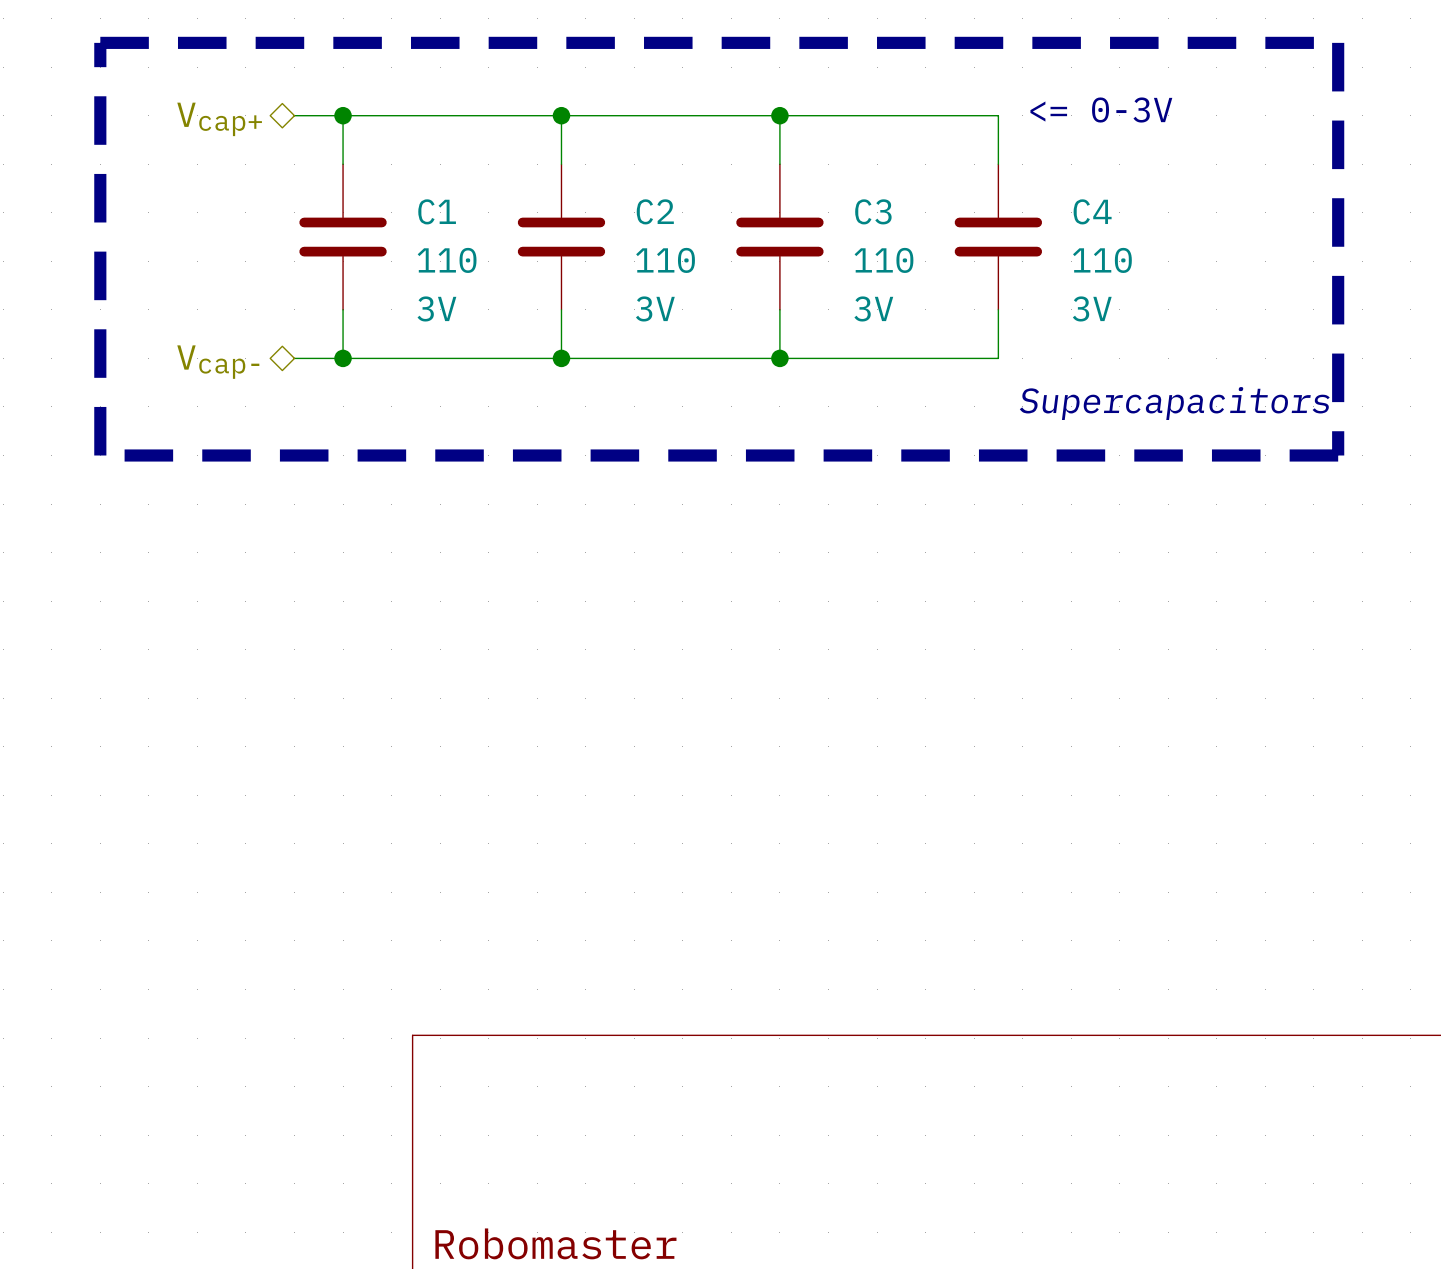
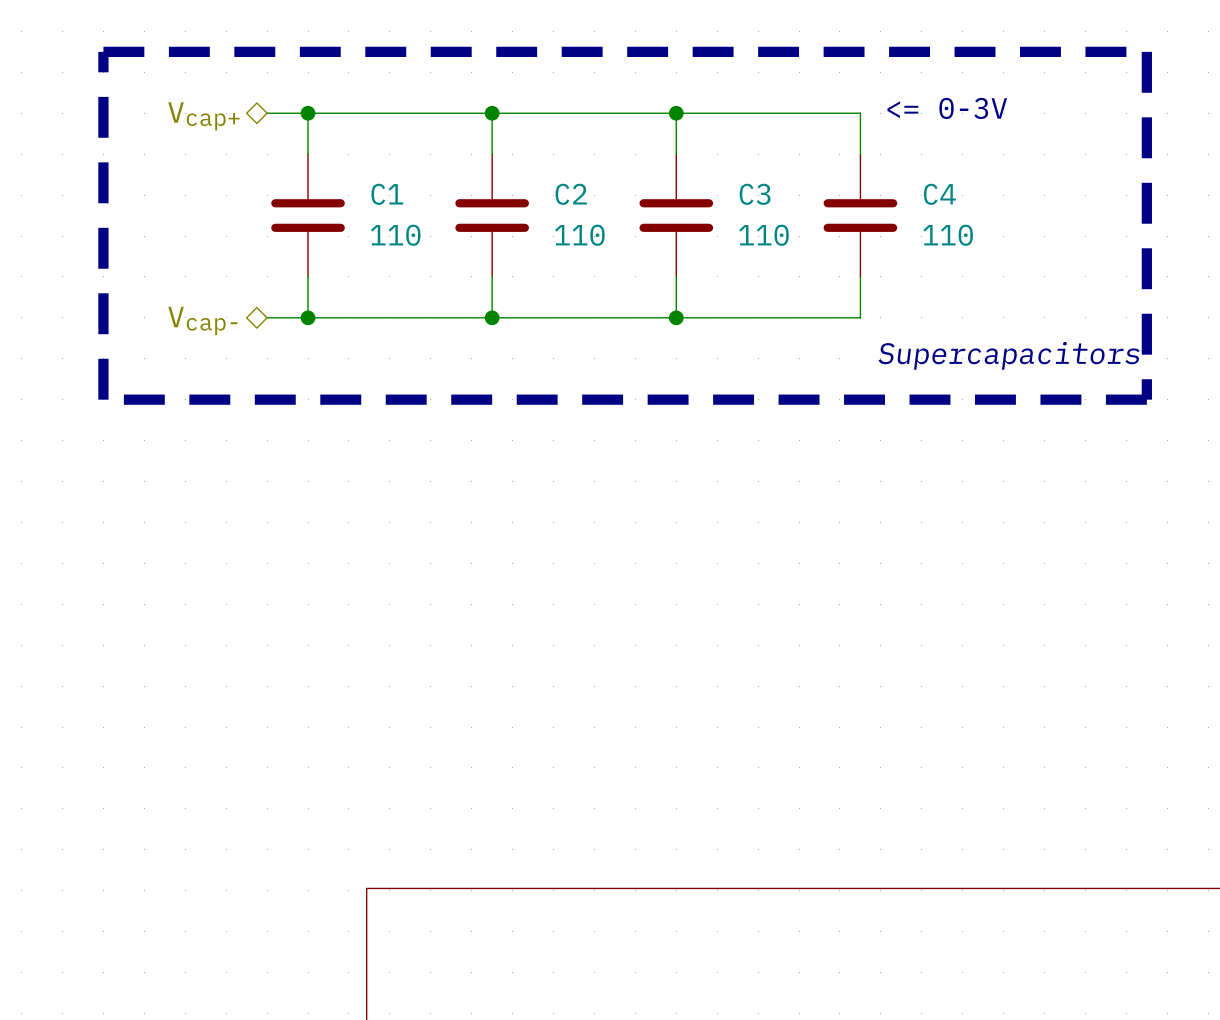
C1 text: 3V (436, 308) -> none
C2 text: 3V (655, 308) -> none
C3 text: 3V (873, 308) -> none
C4 text: 3V (1092, 308) -> none

